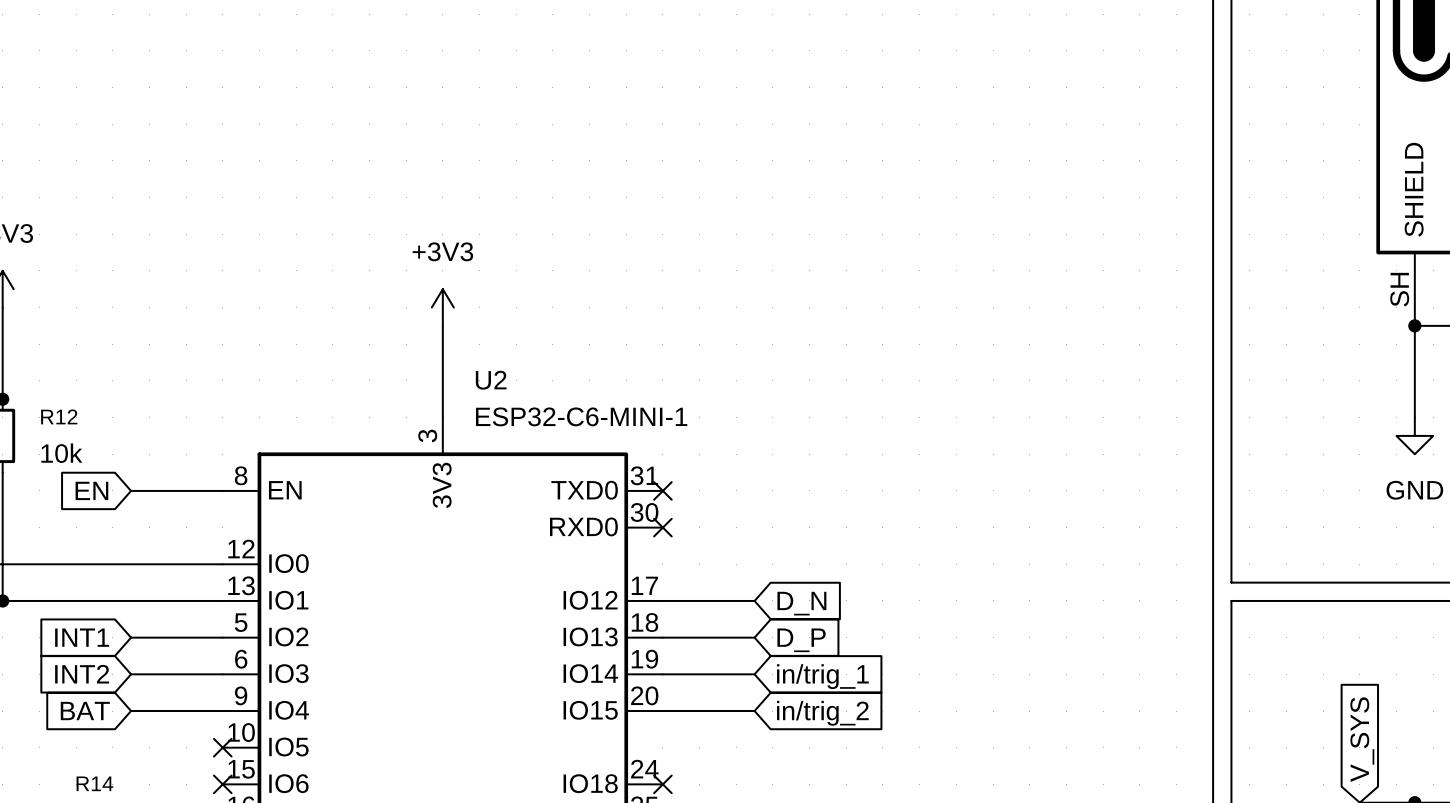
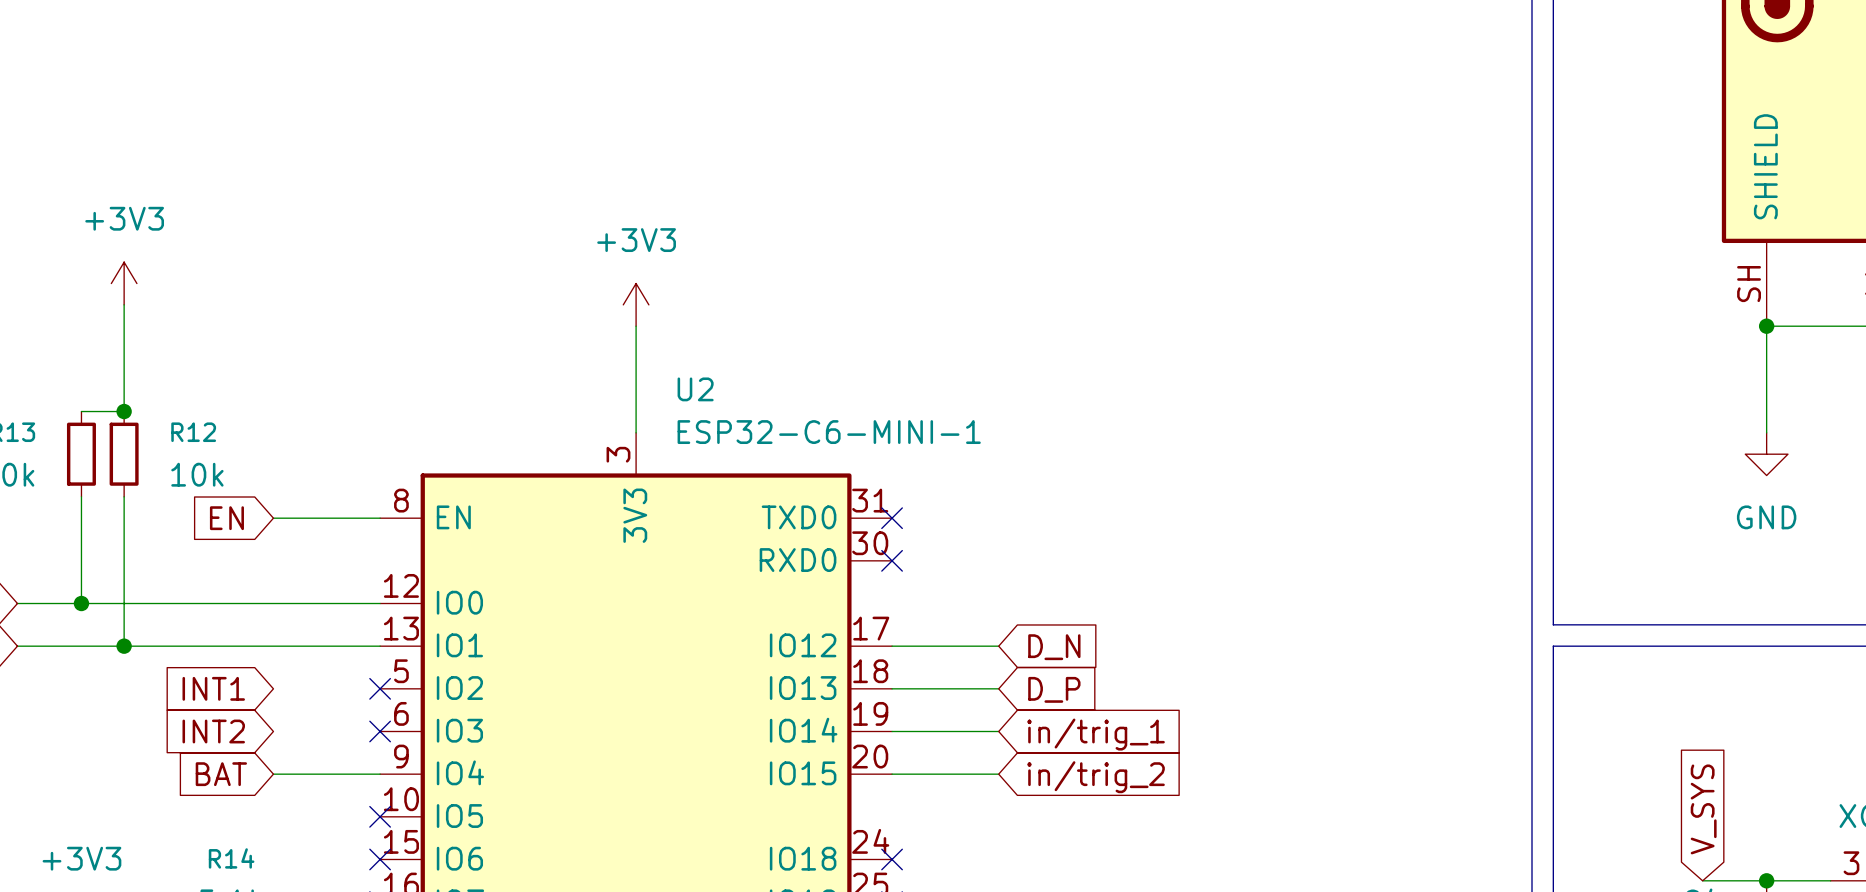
wire: (131, 637) (222, 637) -> none
no-connect mark: none -> (380, 688)
wire: (131, 674) (222, 674) -> none
no-connect mark: none -> (380, 731)

